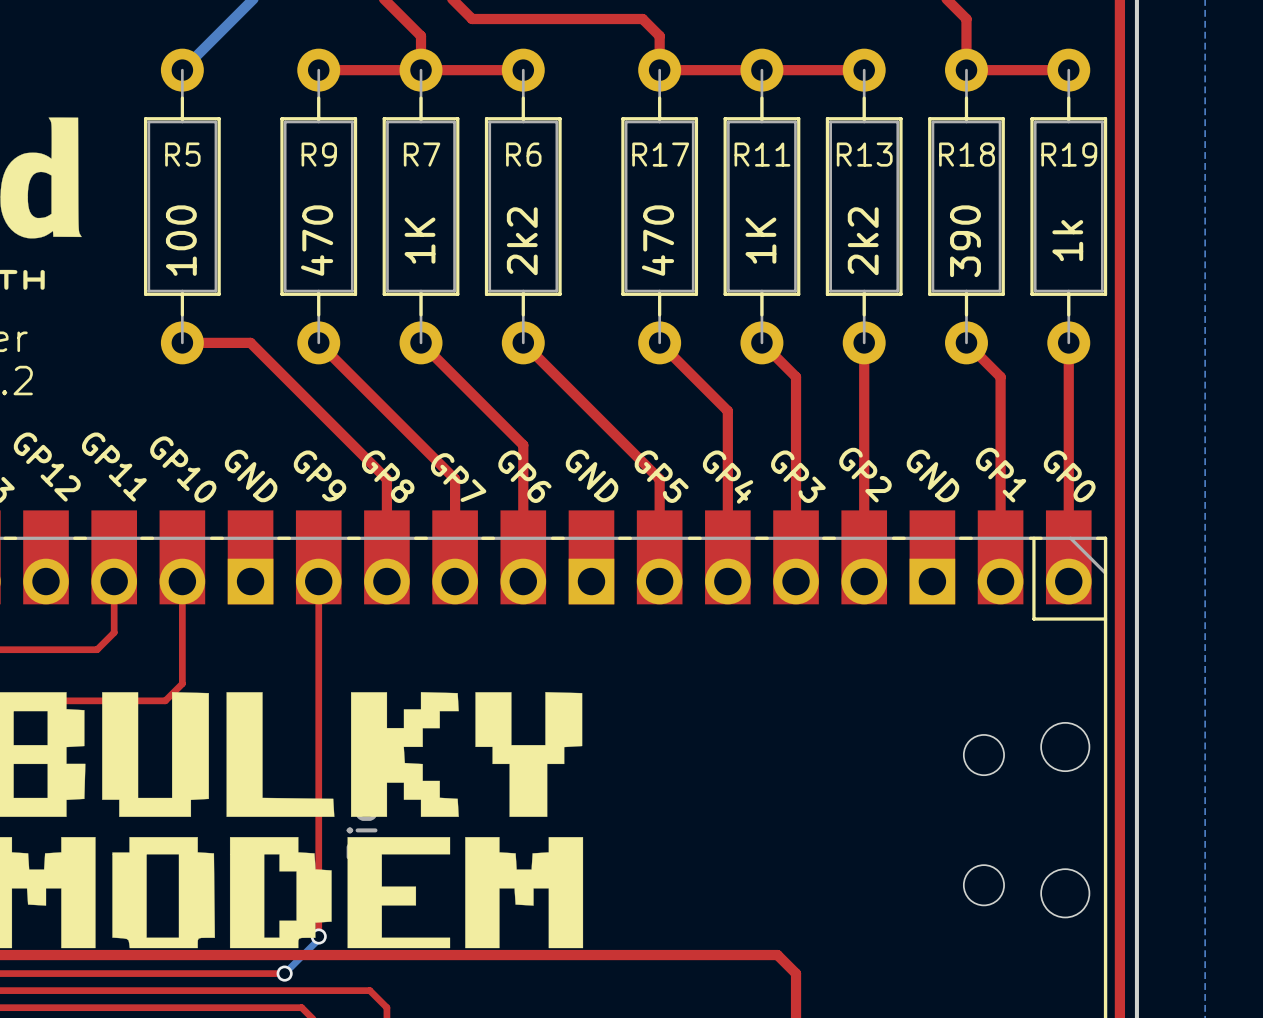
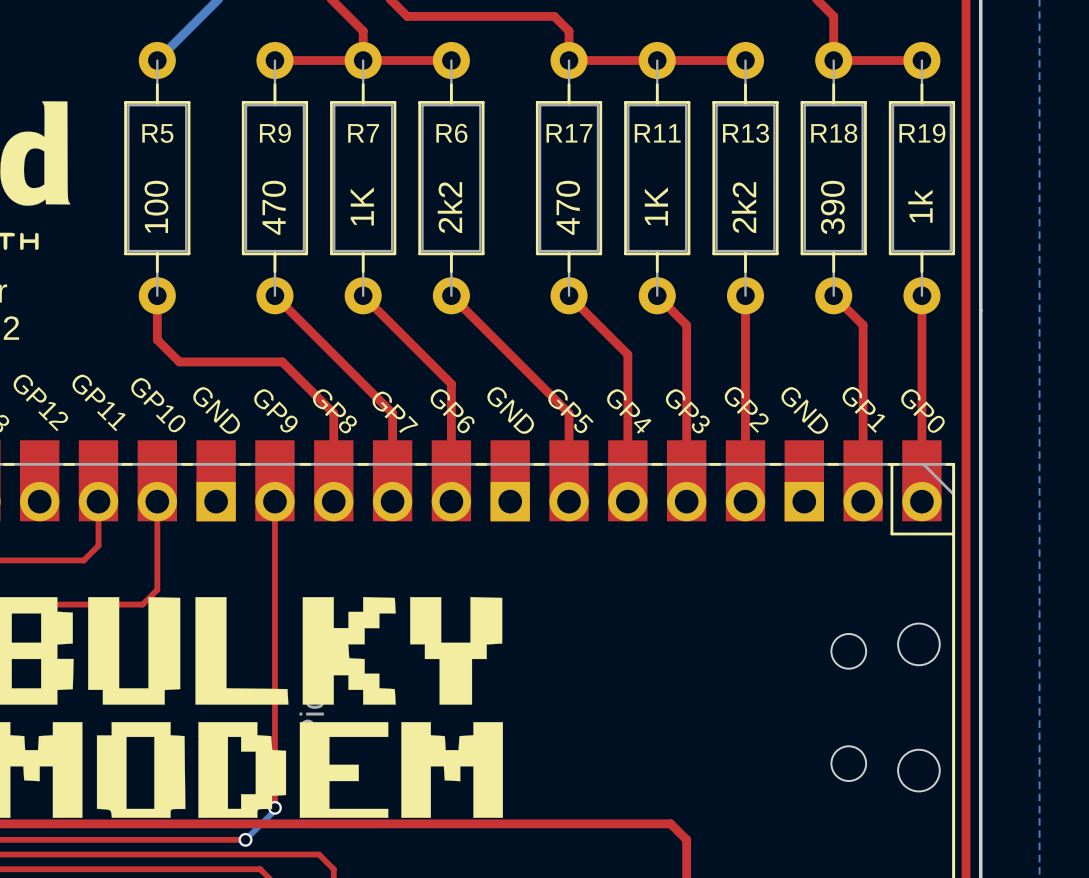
top track: (182, 342) (250, 342) (327, 419) -> (157, 295) (157, 339) (179, 361) (282, 361)

